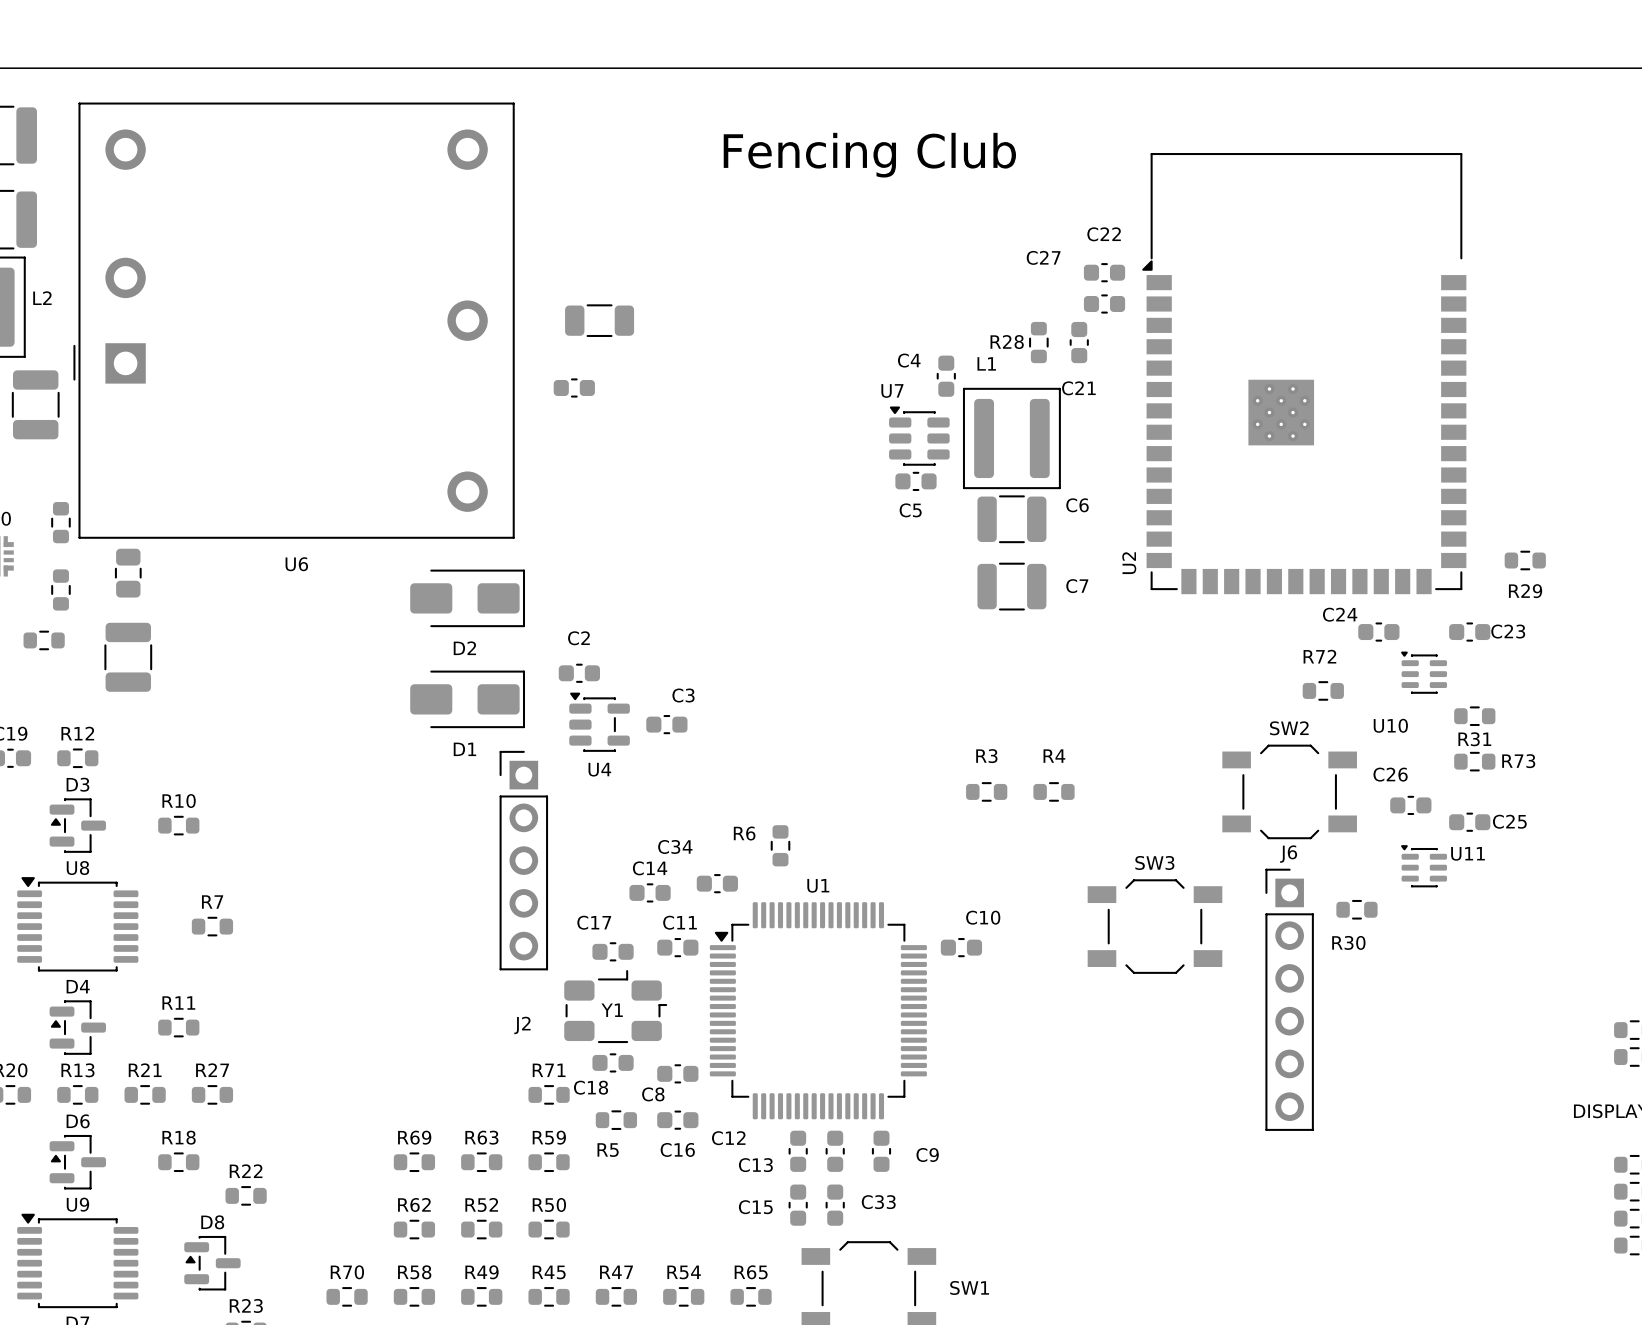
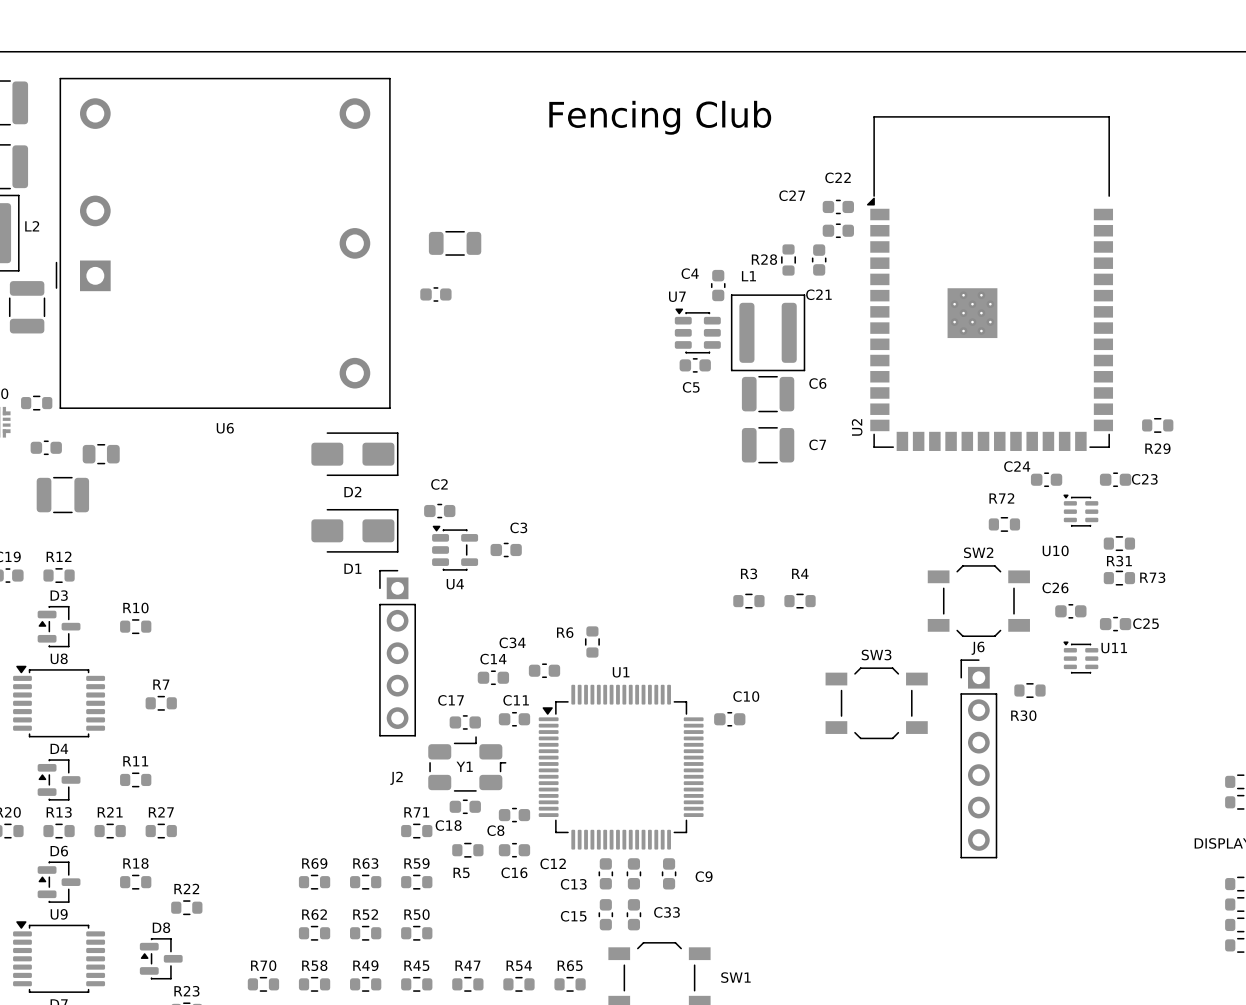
part rotation: 0° (60, 522) -> 90° clockwise (36, 403)
part footprint: [51, 569, 71, 611] -> [30, 440, 62, 456]
part rotation: 0° (128, 573) -> 90° clockwise (101, 454)
part: (44, 640) -> none
part rotation: 0° (128, 657) -> 90° clockwise (62, 495)
part position: (128, 657) -> (62, 495)

